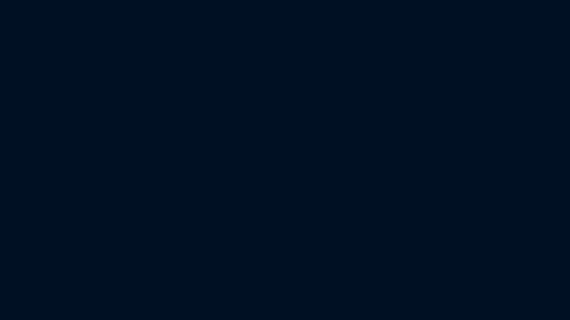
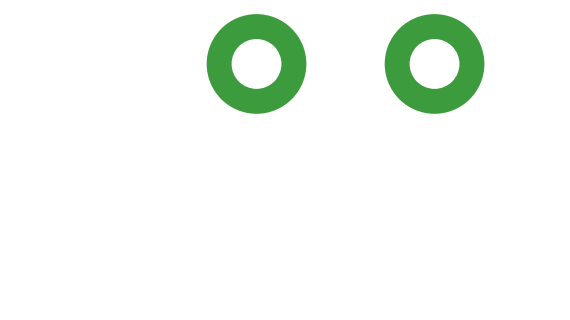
part: none -> (345, 63)

